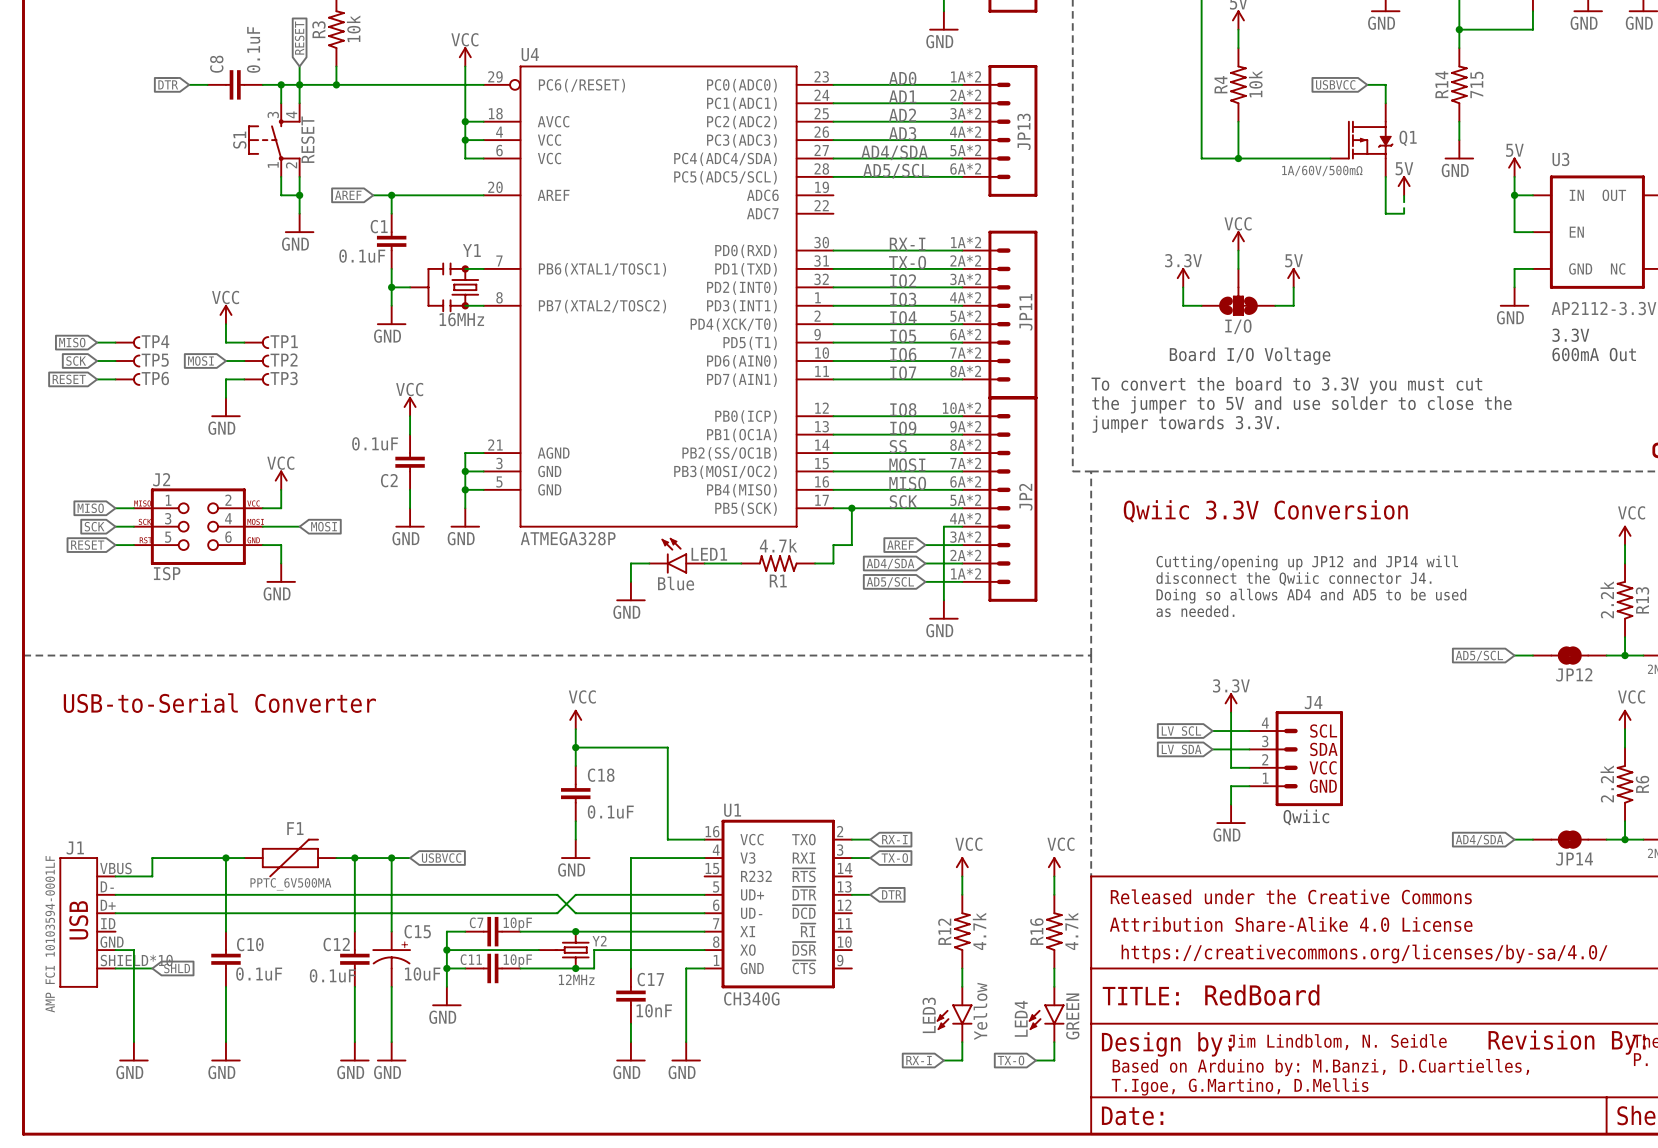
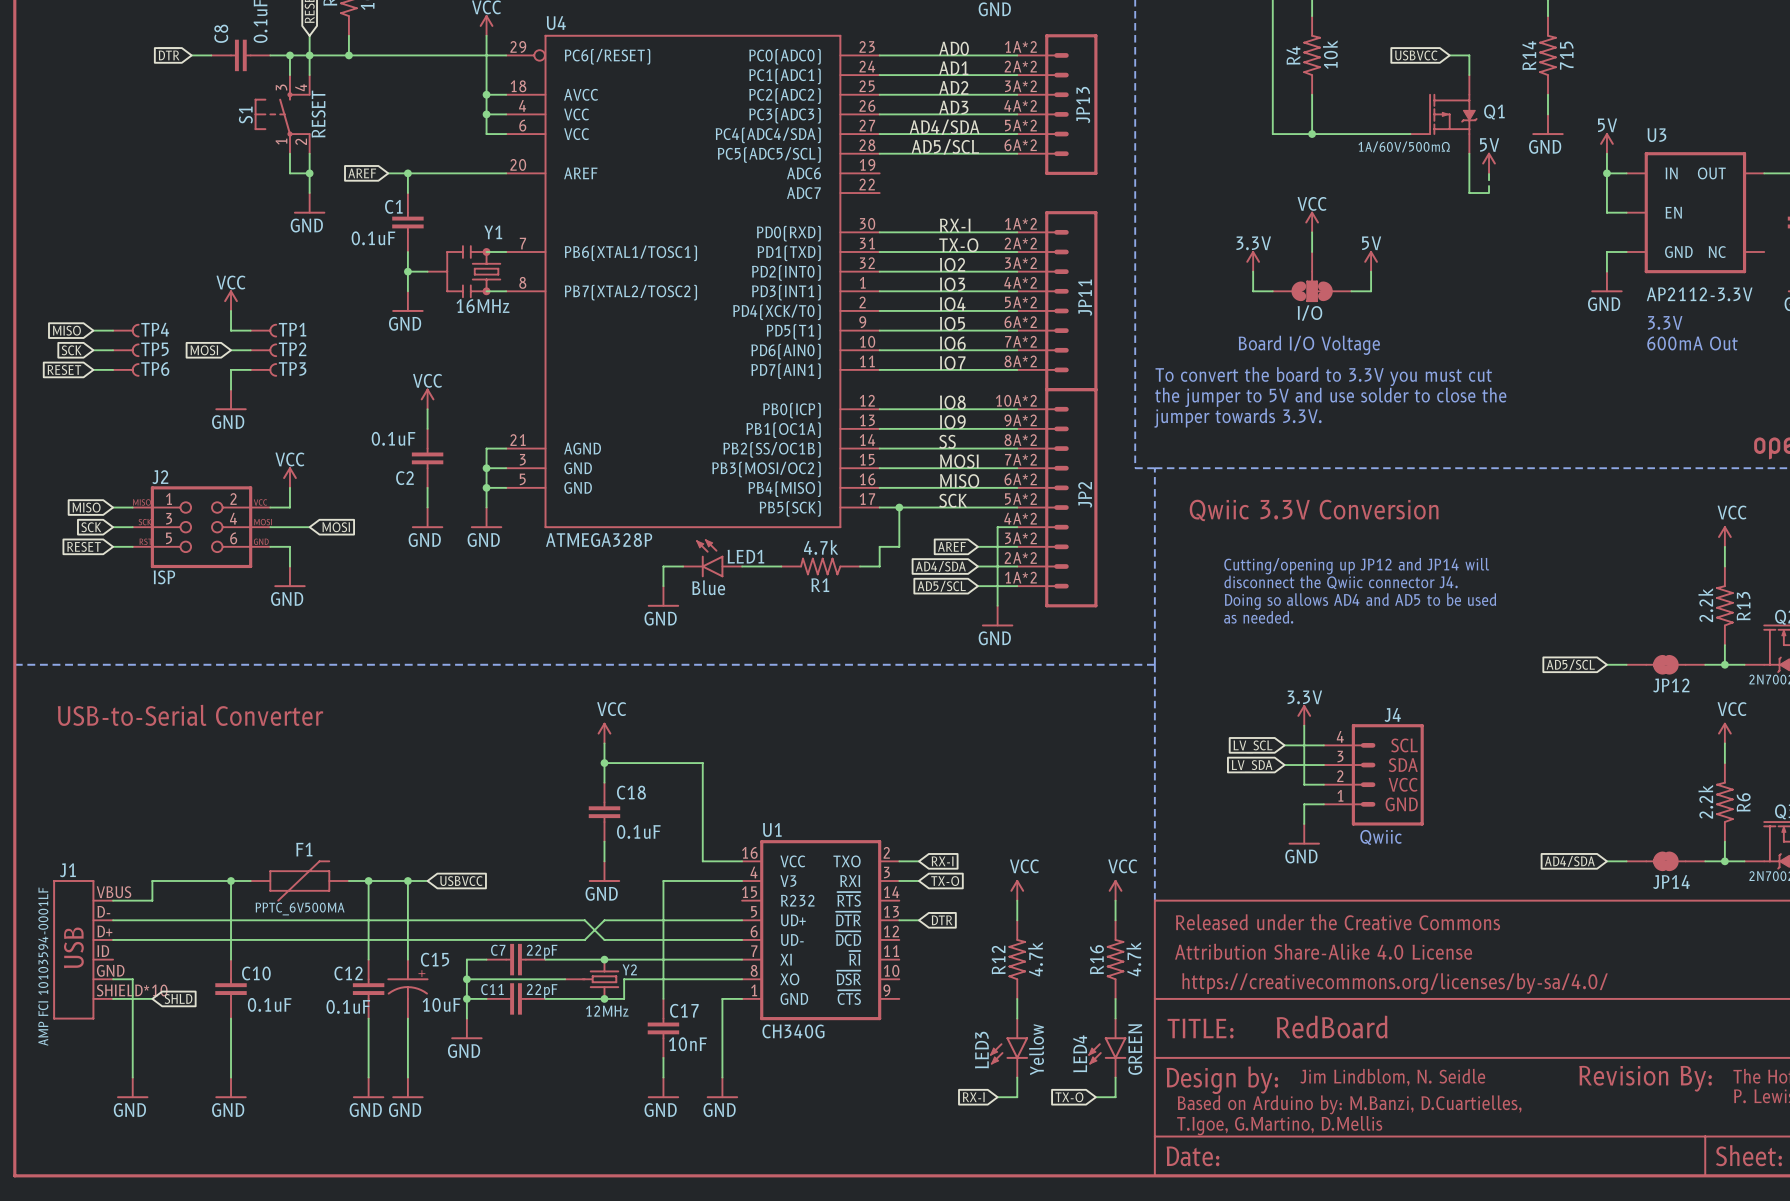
C7 value: 10pF (517, 924) -> 22pF (542, 952)
C11 value: 10pF (517, 961) -> 22pF (542, 991)

